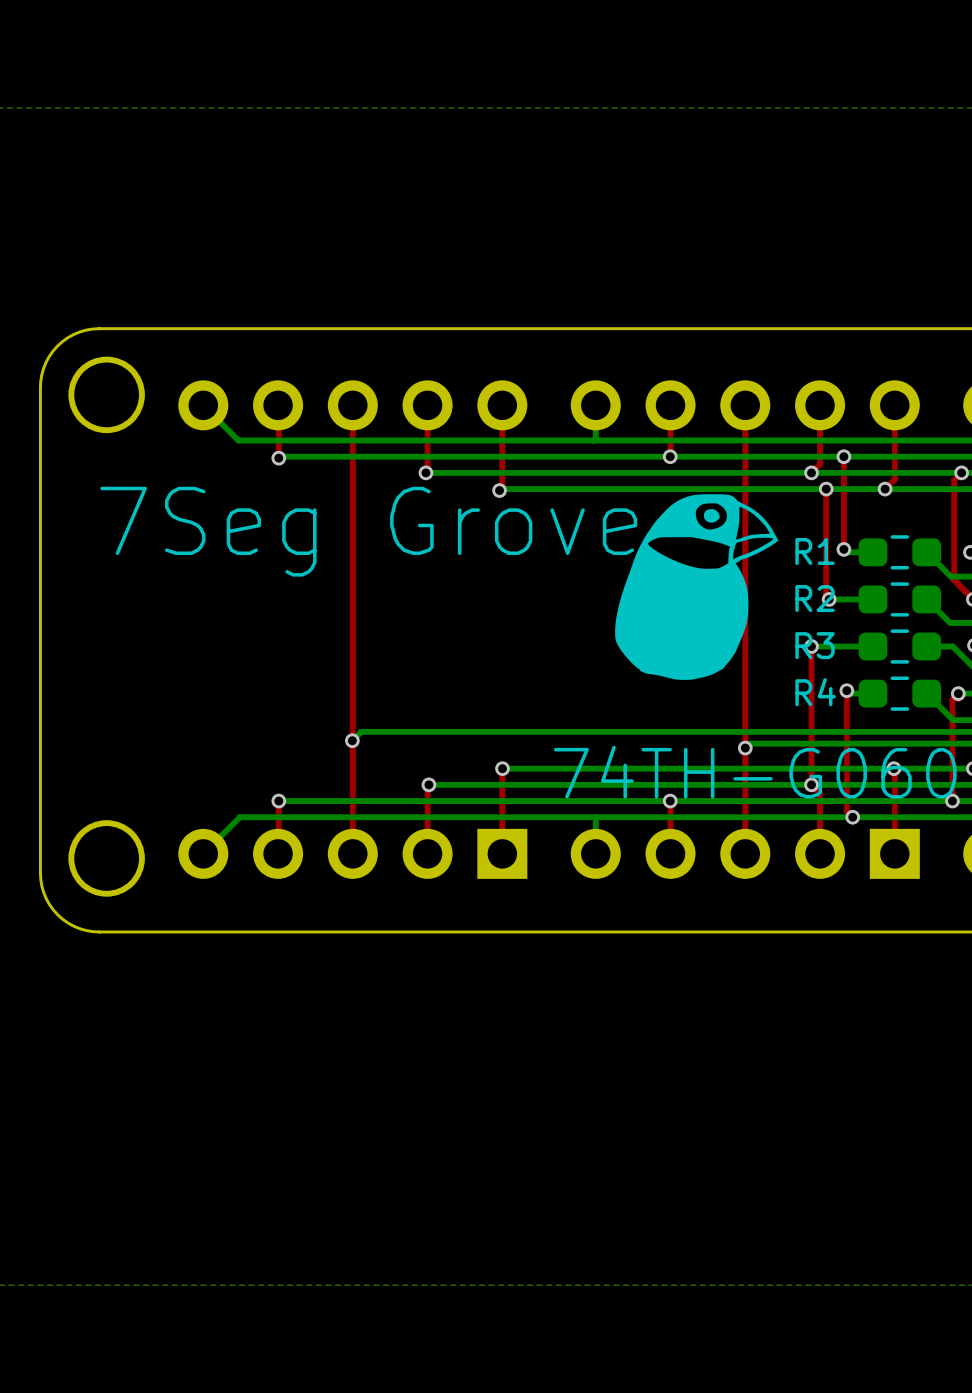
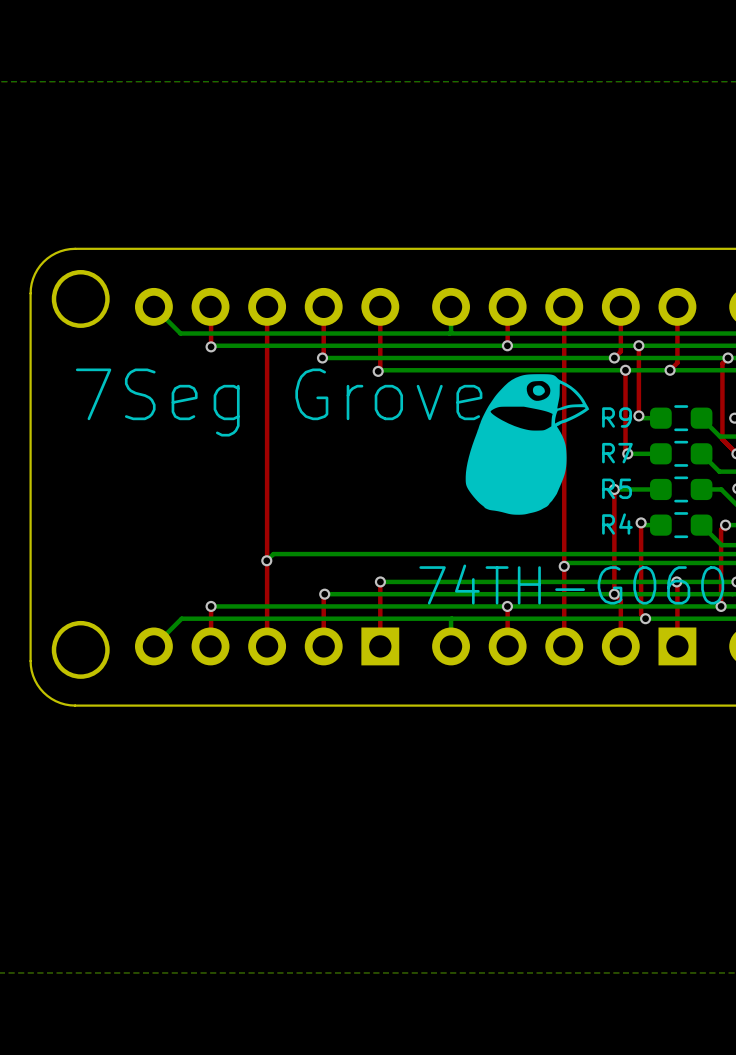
R1 name: R1 (815, 551) -> R9 (617, 417)
R2 name: R2 (815, 598) -> R7 (617, 453)
R3 name: R3 (815, 645) -> R5 (617, 488)

